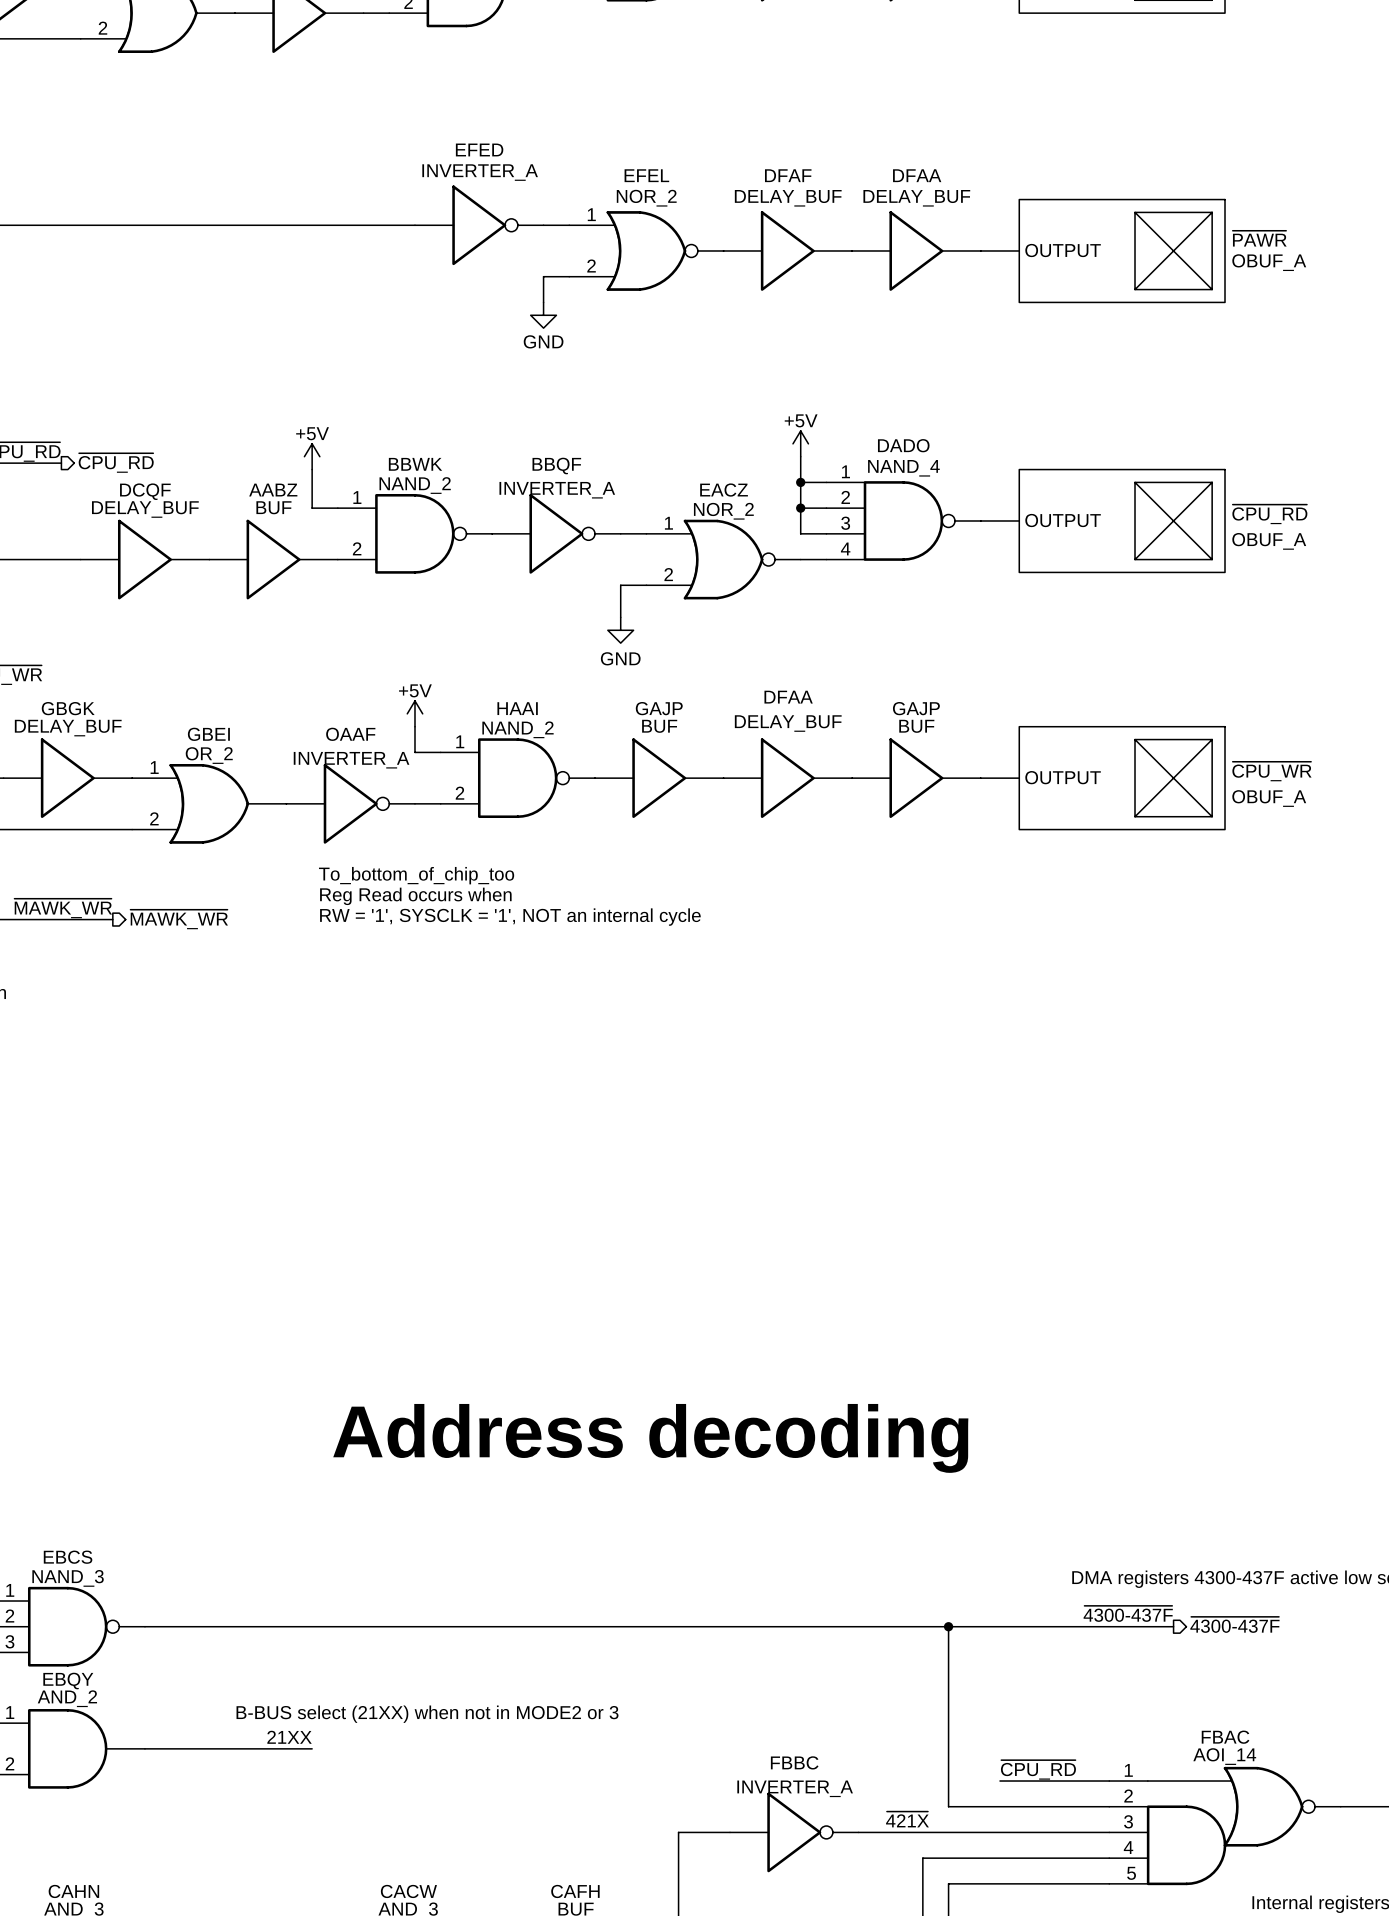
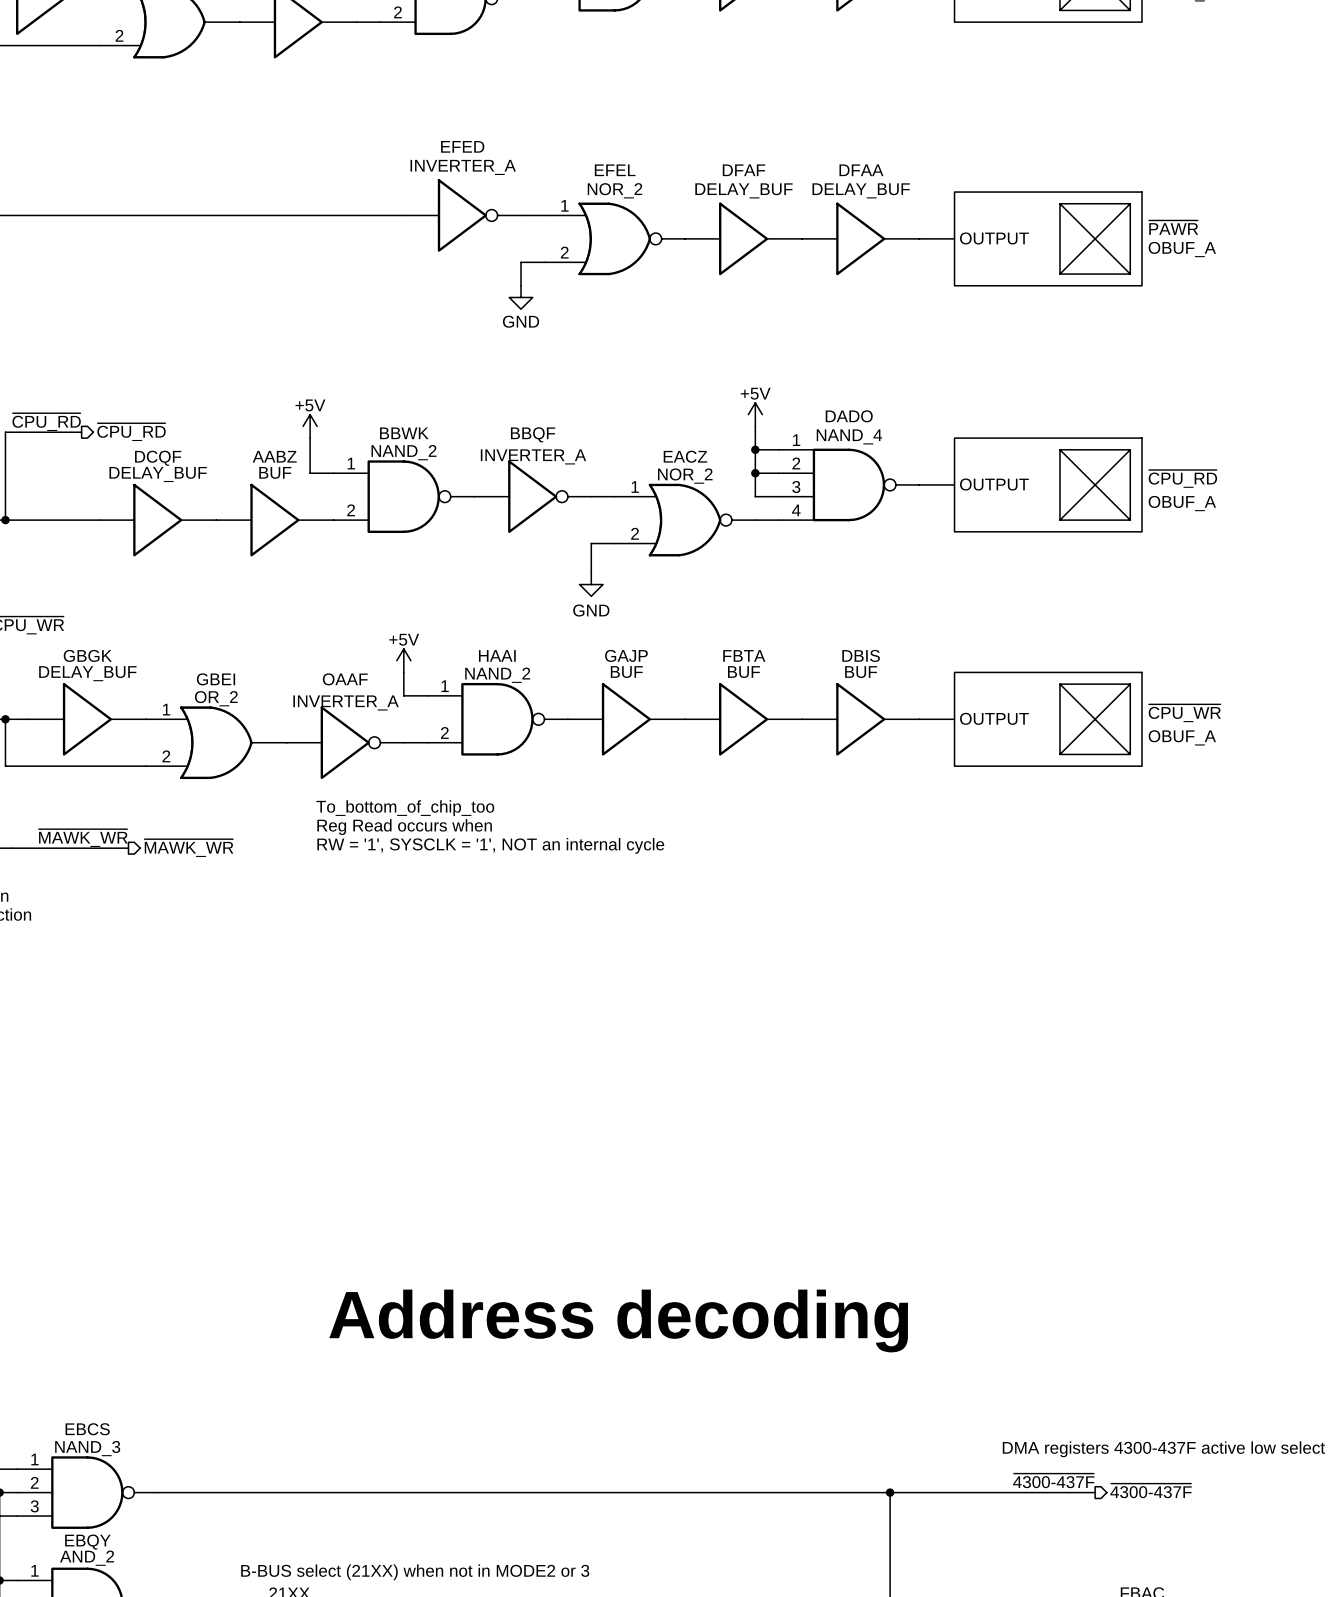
DFAA name: DFAA (788, 697) -> FBTA (744, 655)
GAJP name: GAJP (916, 708) -> DBIS (861, 655)
DFAA value: DELAY_BUF (788, 723) -> BUF (743, 672)

